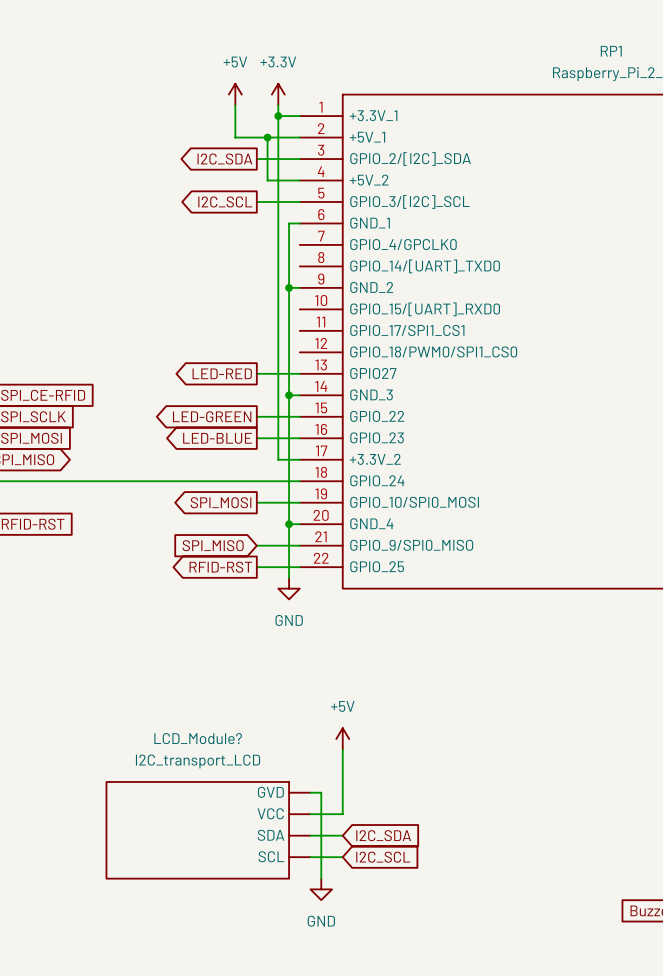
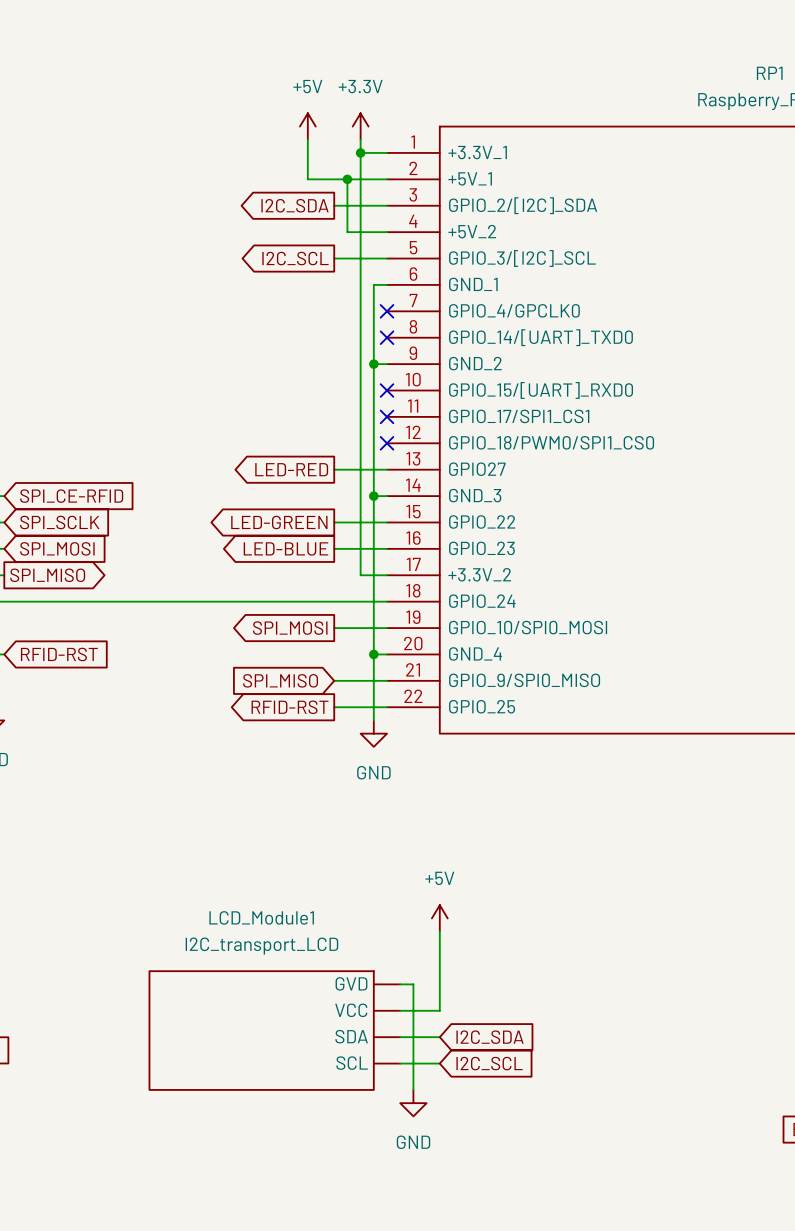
no-connect mark: none -> (387, 311)
no-connect mark: none -> (387, 337)
no-connect mark: none -> (387, 390)
no-connect mark: none -> (387, 416)
no-connect mark: none -> (387, 443)
LCD_Module? name: LCD_Module? (198, 738) -> LCD_Module1 (261, 917)

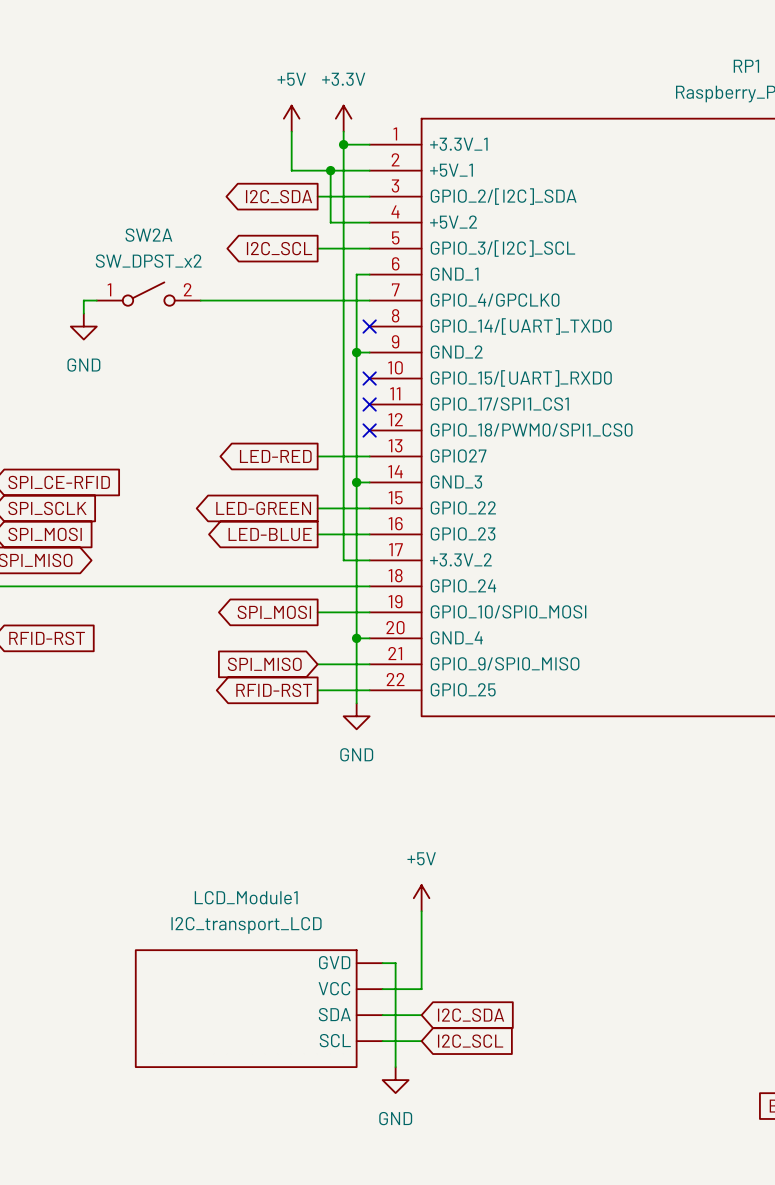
SW2A: none -> SW_DPST_x2 (148, 294)
wire: none -> (96, 300) (83, 300) (83, 313)
wire: none -> (200, 300) (369, 300)
no-connect mark: (387, 311) -> none
power symbol: none -> GND (83, 326)

